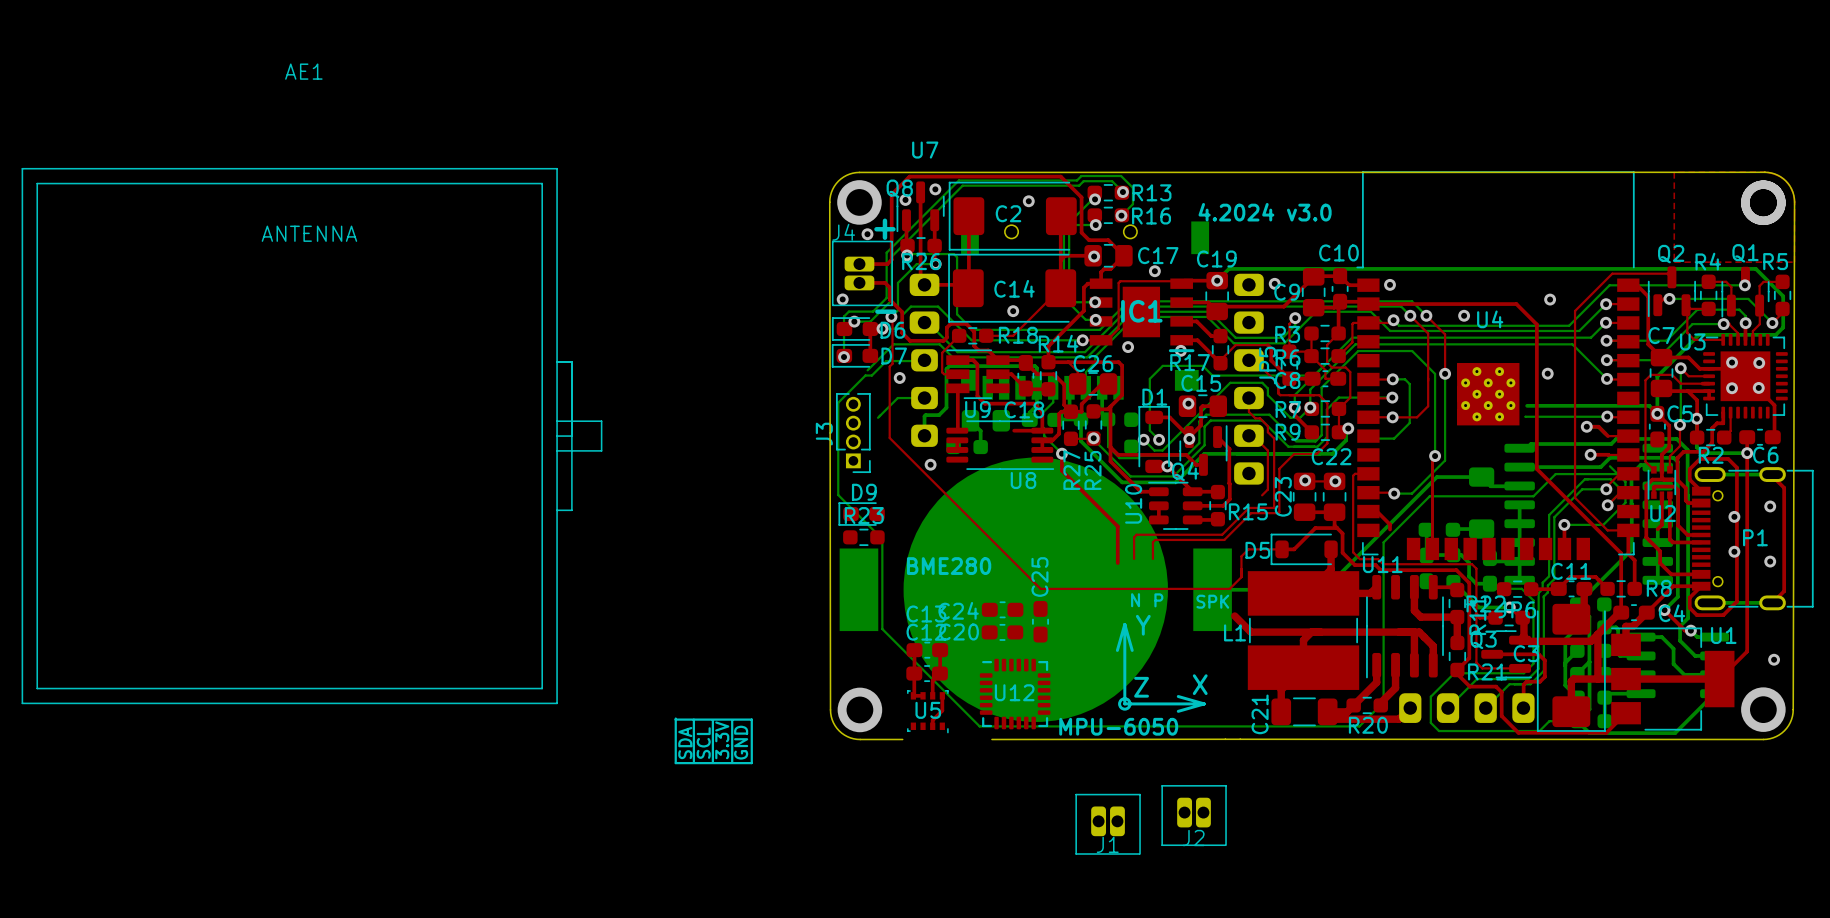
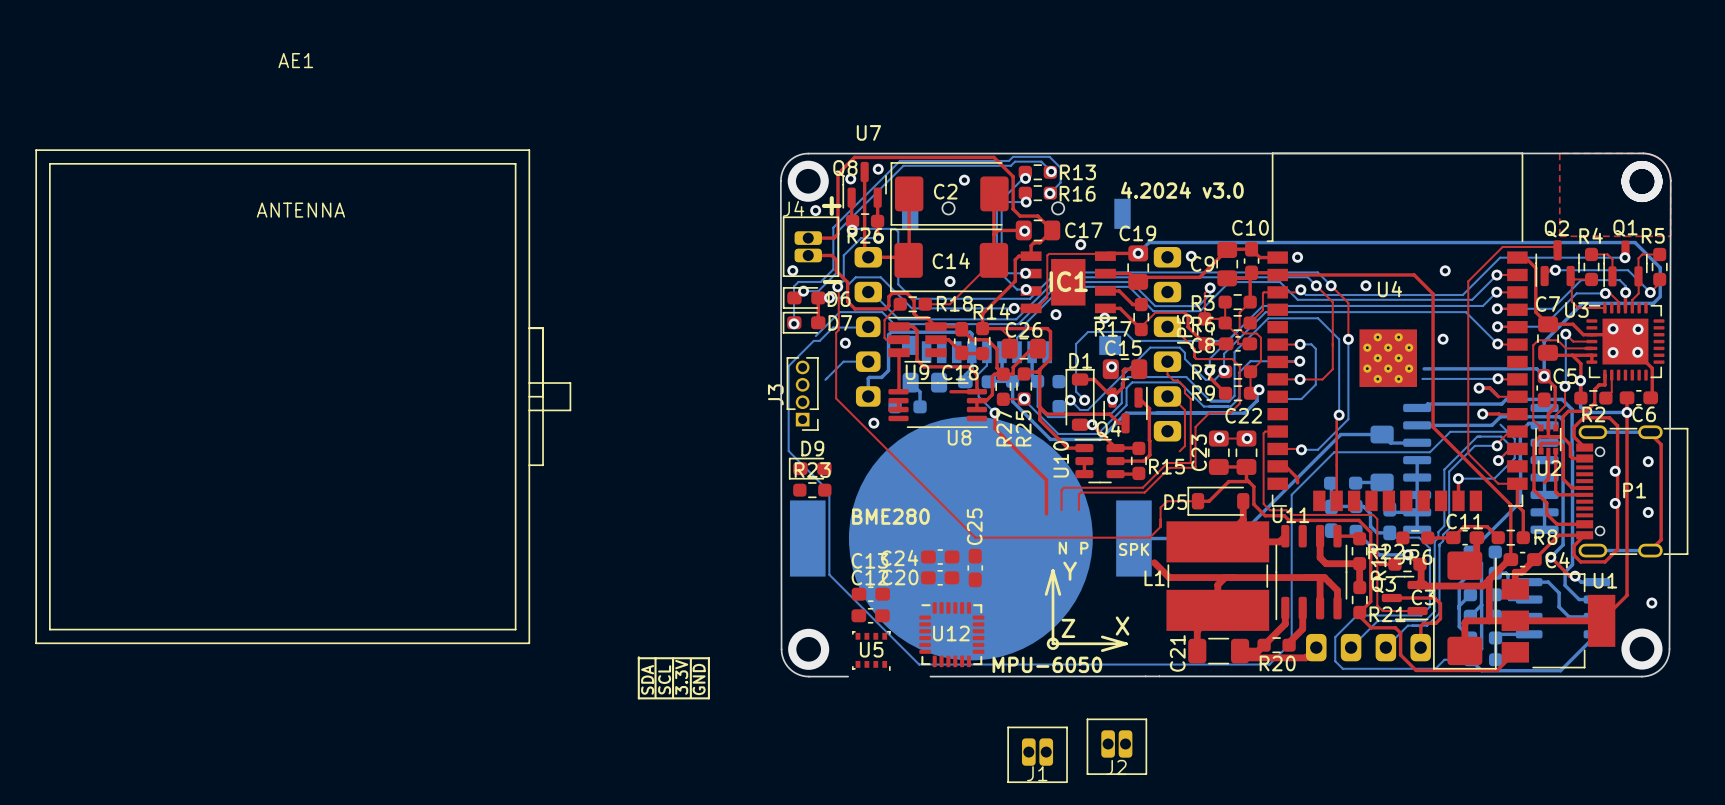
top track: (914, 650) (913, 695) (923, 695) -> none
top track: (940, 650) (940, 673) (932, 680) (932, 695) -> none
top track: (942, 695) (942, 710) (932, 720) (932, 726) -> none

